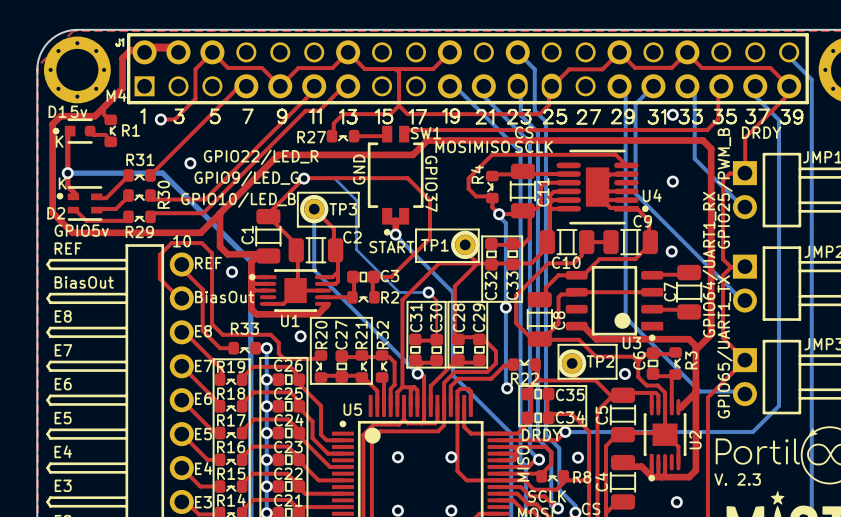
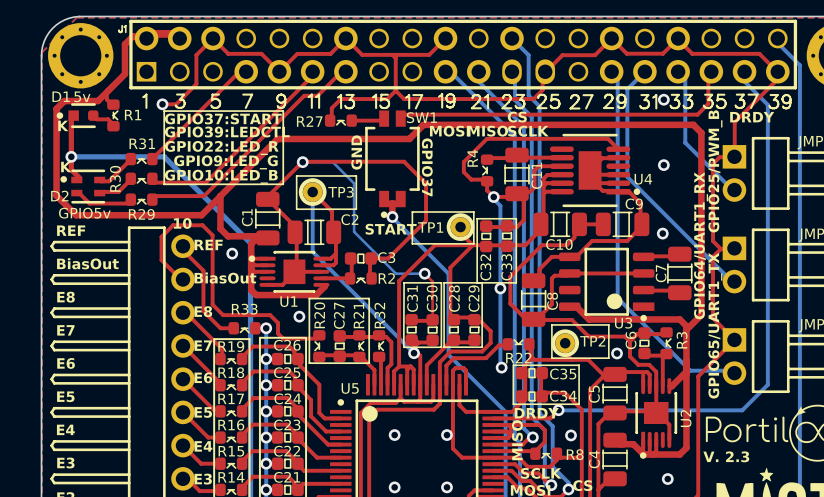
M4 name: M4 (116, 95) -> none
line: none -> (164, 111) (164, 184) (283, 184) (283, 111) (164, 111)
text: none -> GPIO37:START (223, 118)
text: none -> GPIO39:LEDCTL (227, 132)
text: GPIO22/LED_R (261, 157) -> none
via: (190, 163) -> none
text: none -> GPIO22:LED_R (221, 147)
text: none -> GPIO9:LED_G (225, 162)
text: GPIO9/LED_G (246, 178) -> none
text: none -> GPIO10:LED_B (221, 176)
R30 name position: R30 (163, 194) -> R30 (115, 178)
text: GPIO10/LED_B (238, 200) -> none

